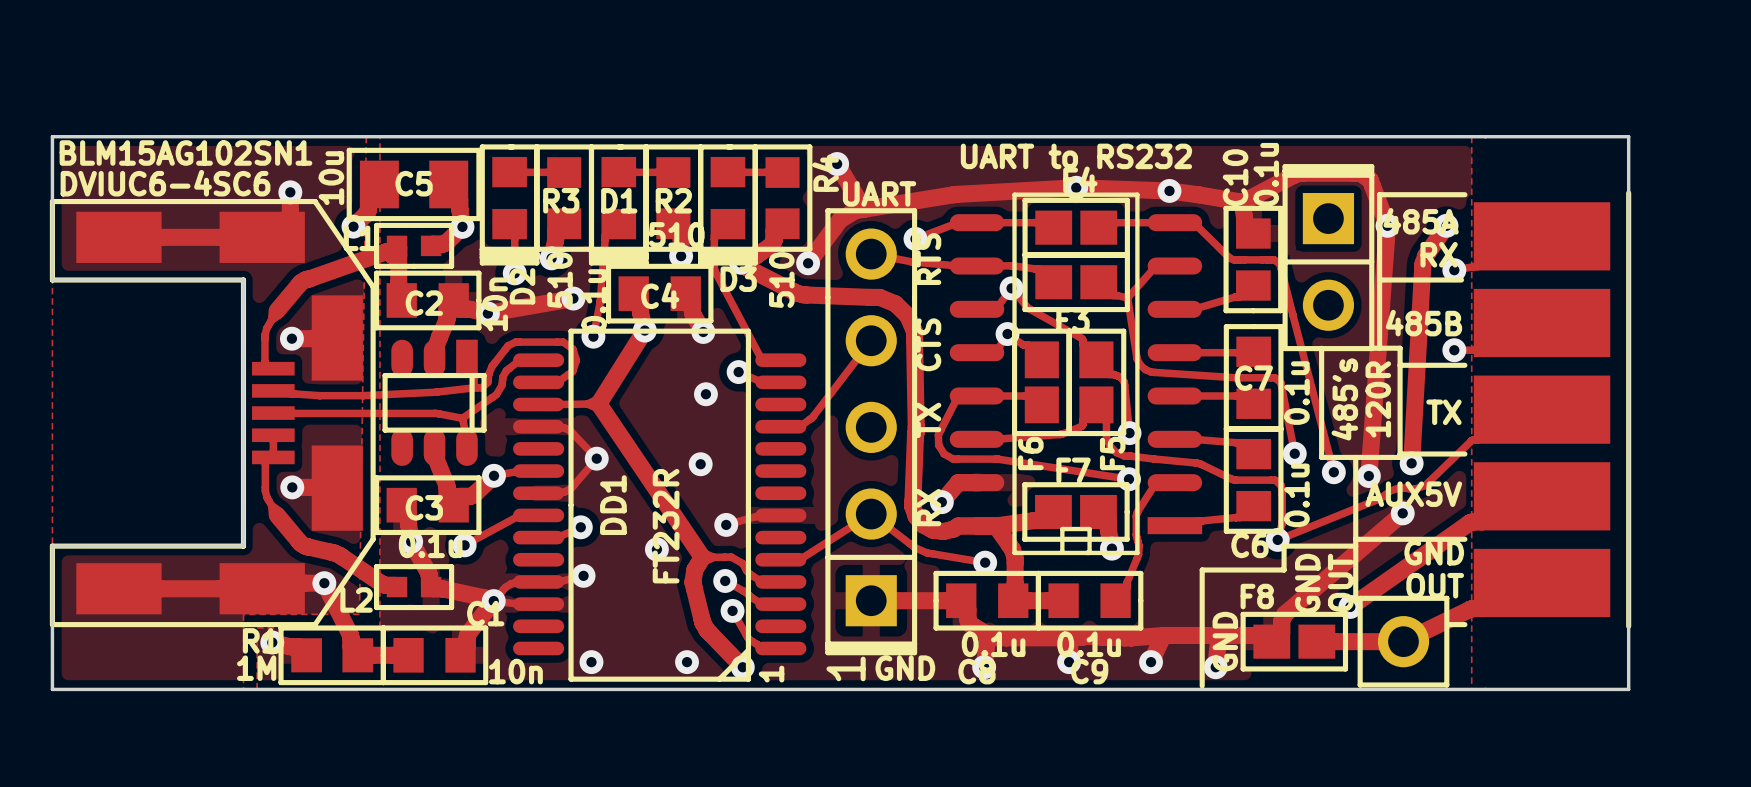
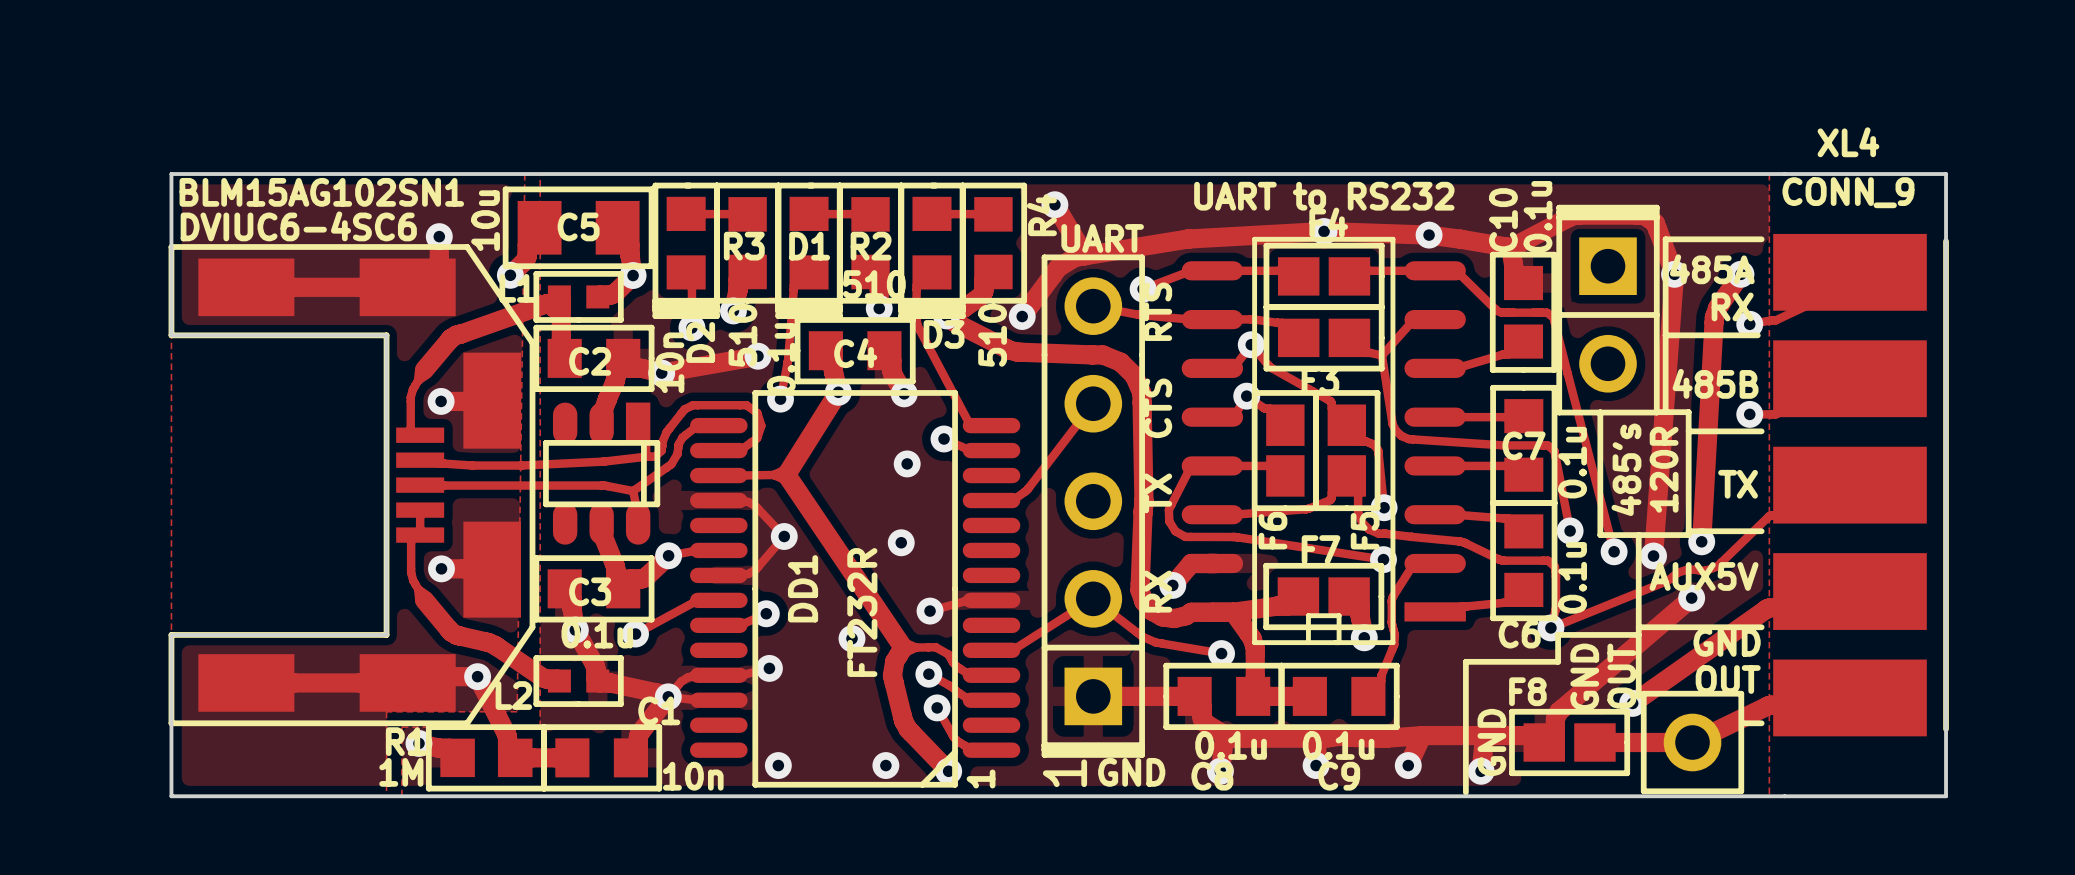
part: (1552, 409) -> none
XL4: none -> CONN_9 (1861, 485)

